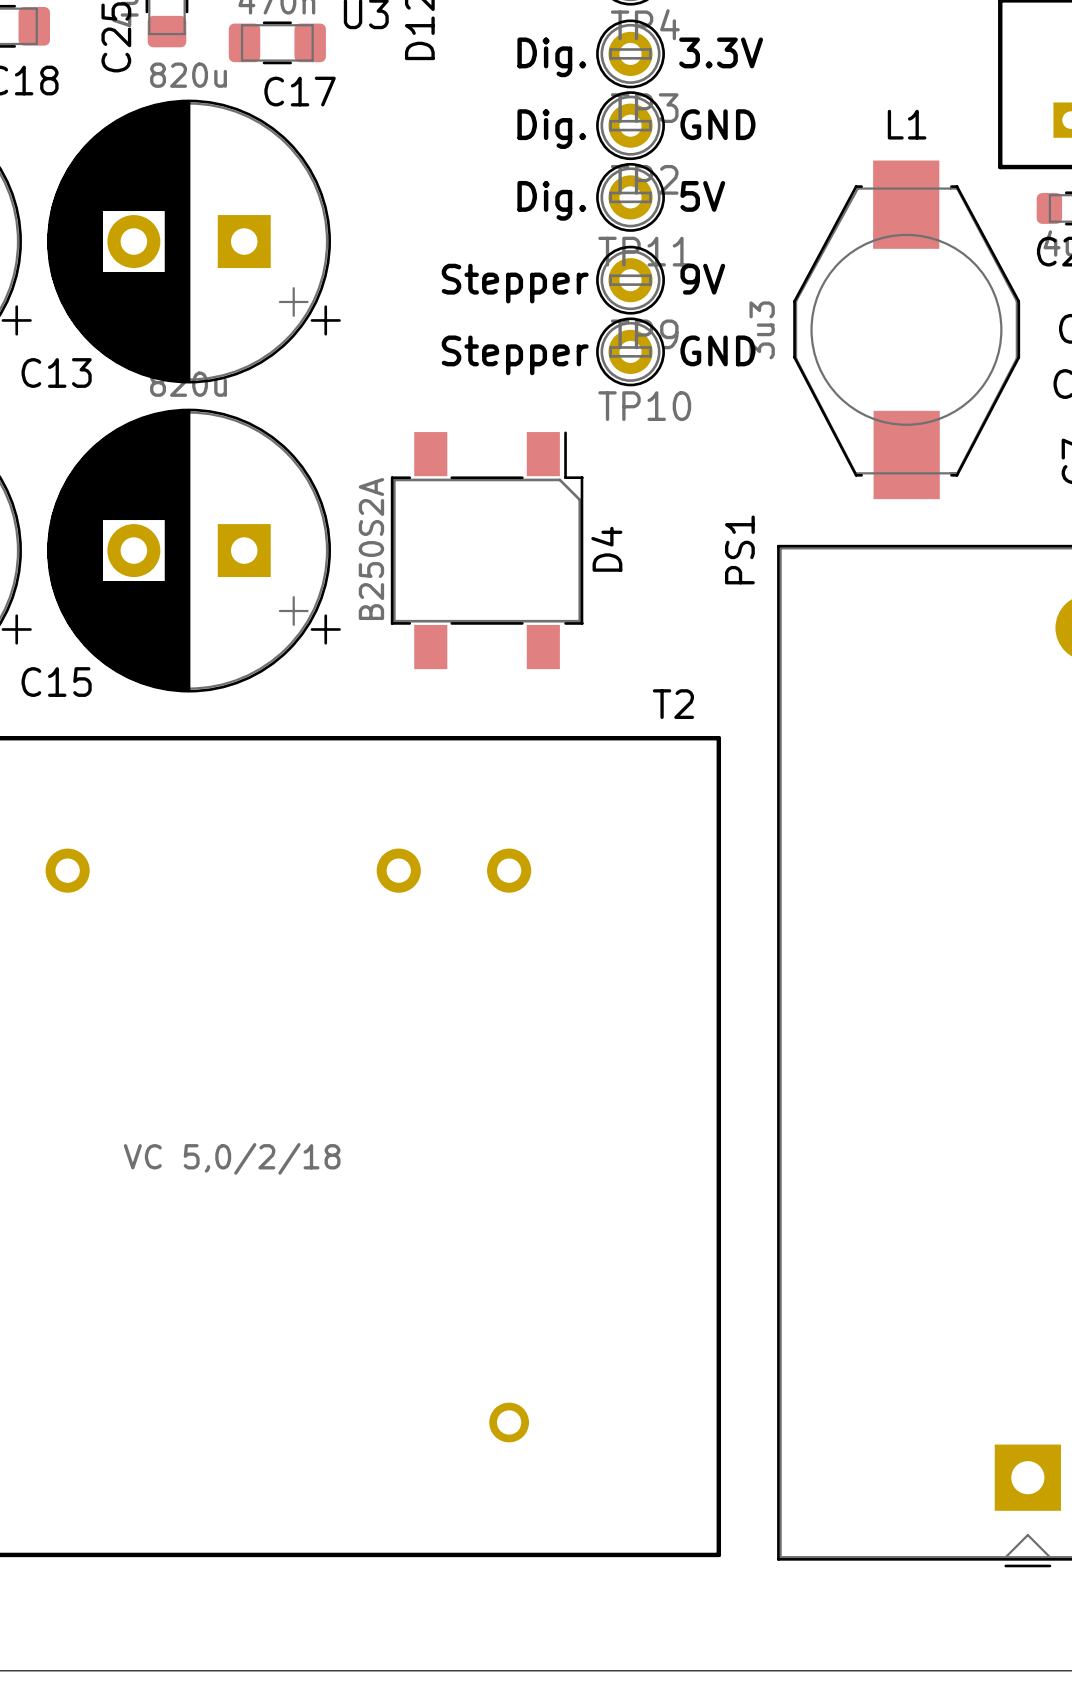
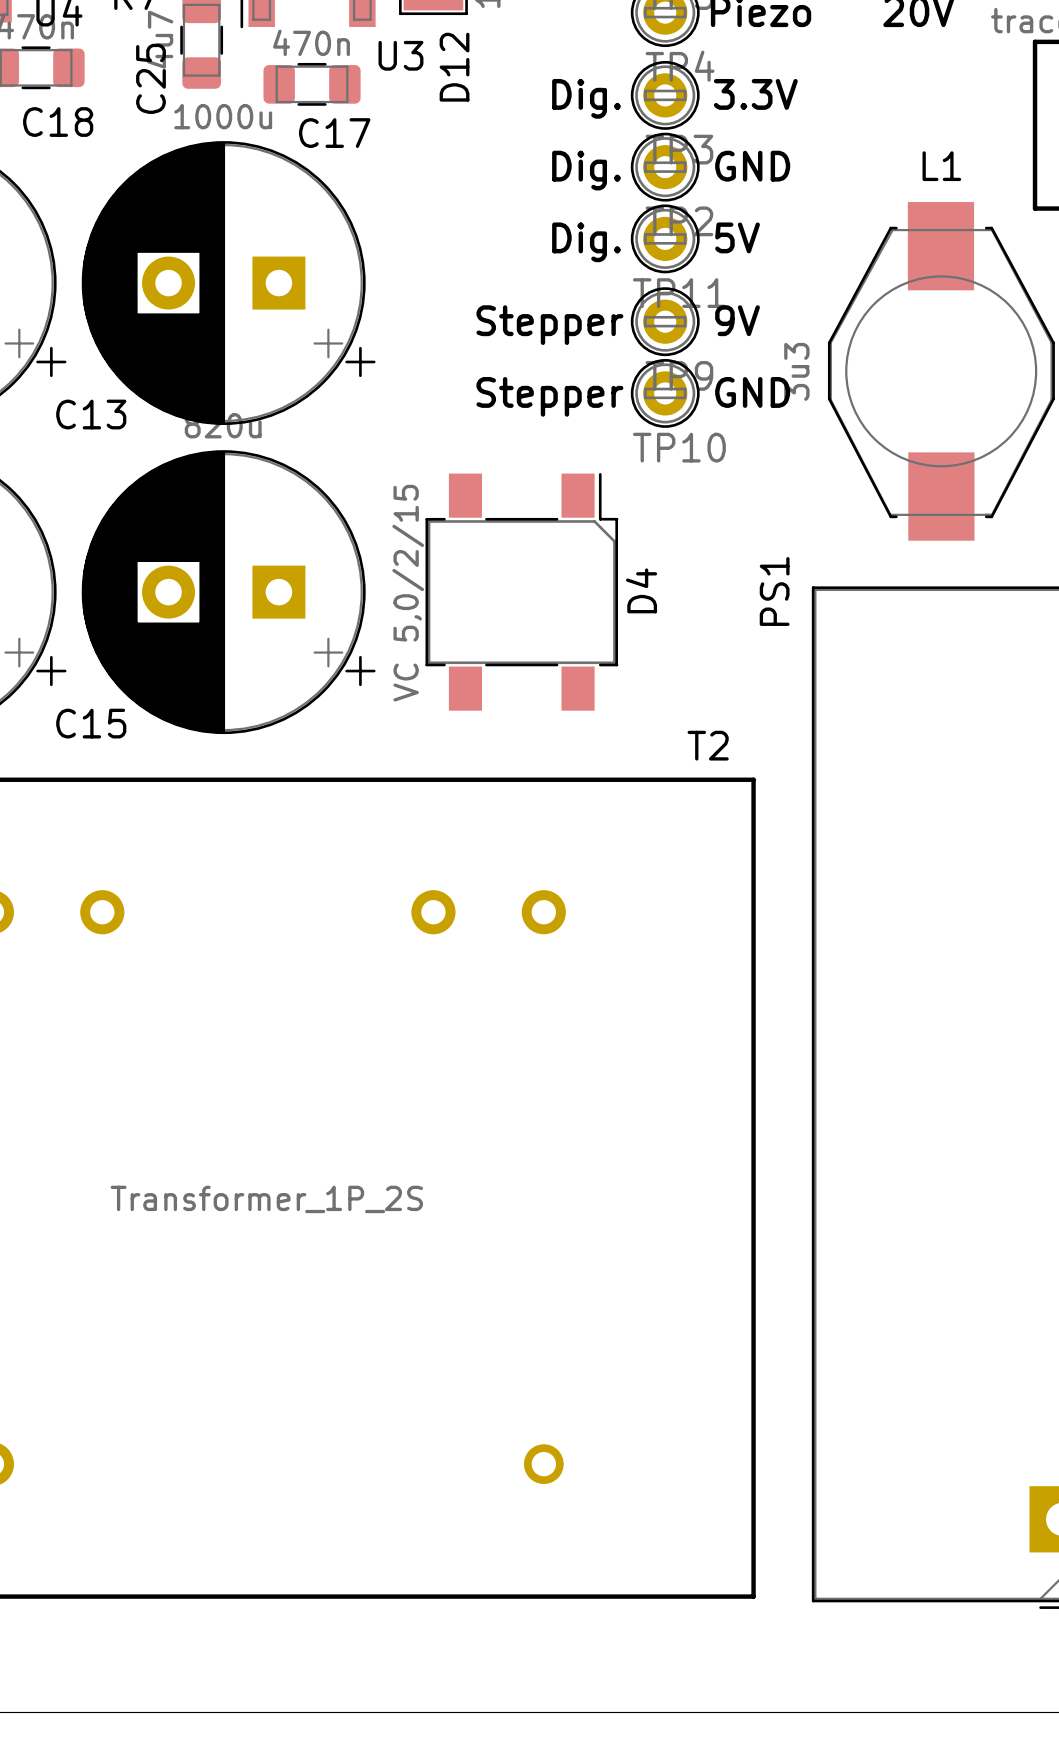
C13 value: 820u (188, 75) -> 1000u (223, 116)
D4 value: B250S2A (371, 549) -> VC 5,0/2/15 (408, 593)
T2 value: VC 5,0/2/18 (232, 1158) -> Transformer_1P_2S (266, 1199)

